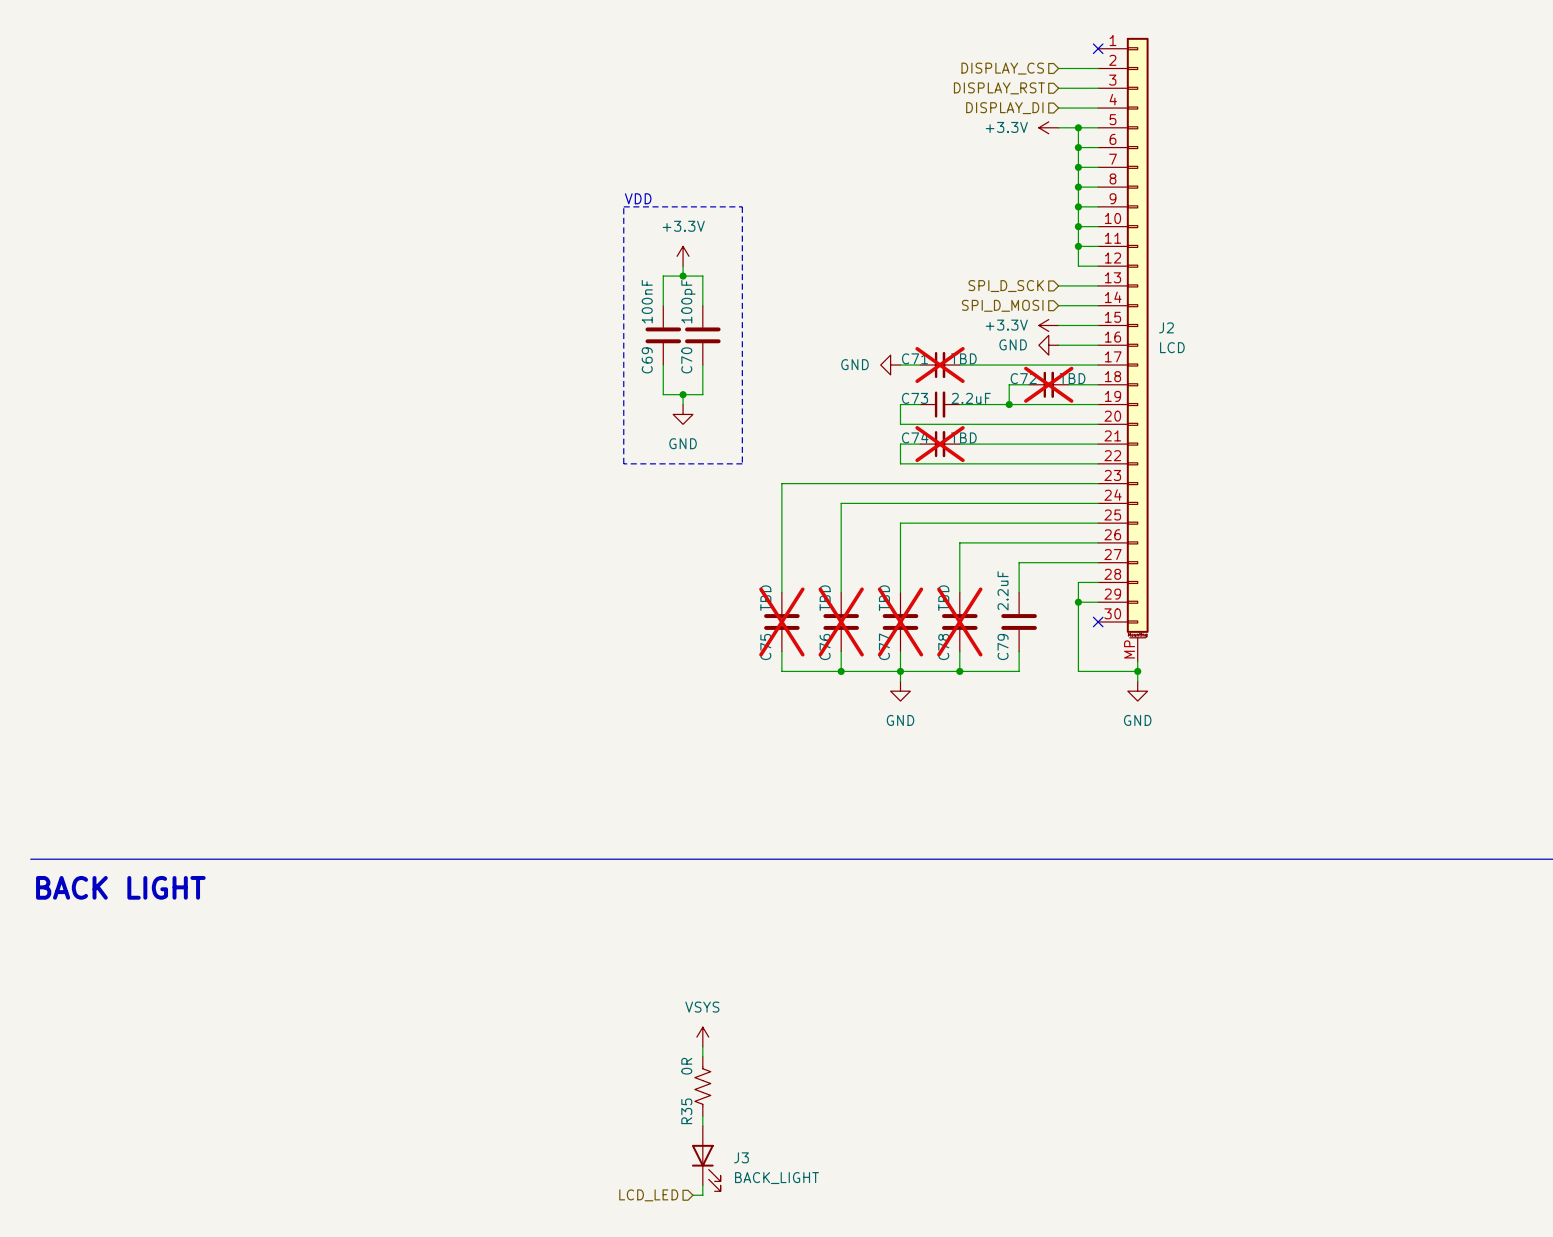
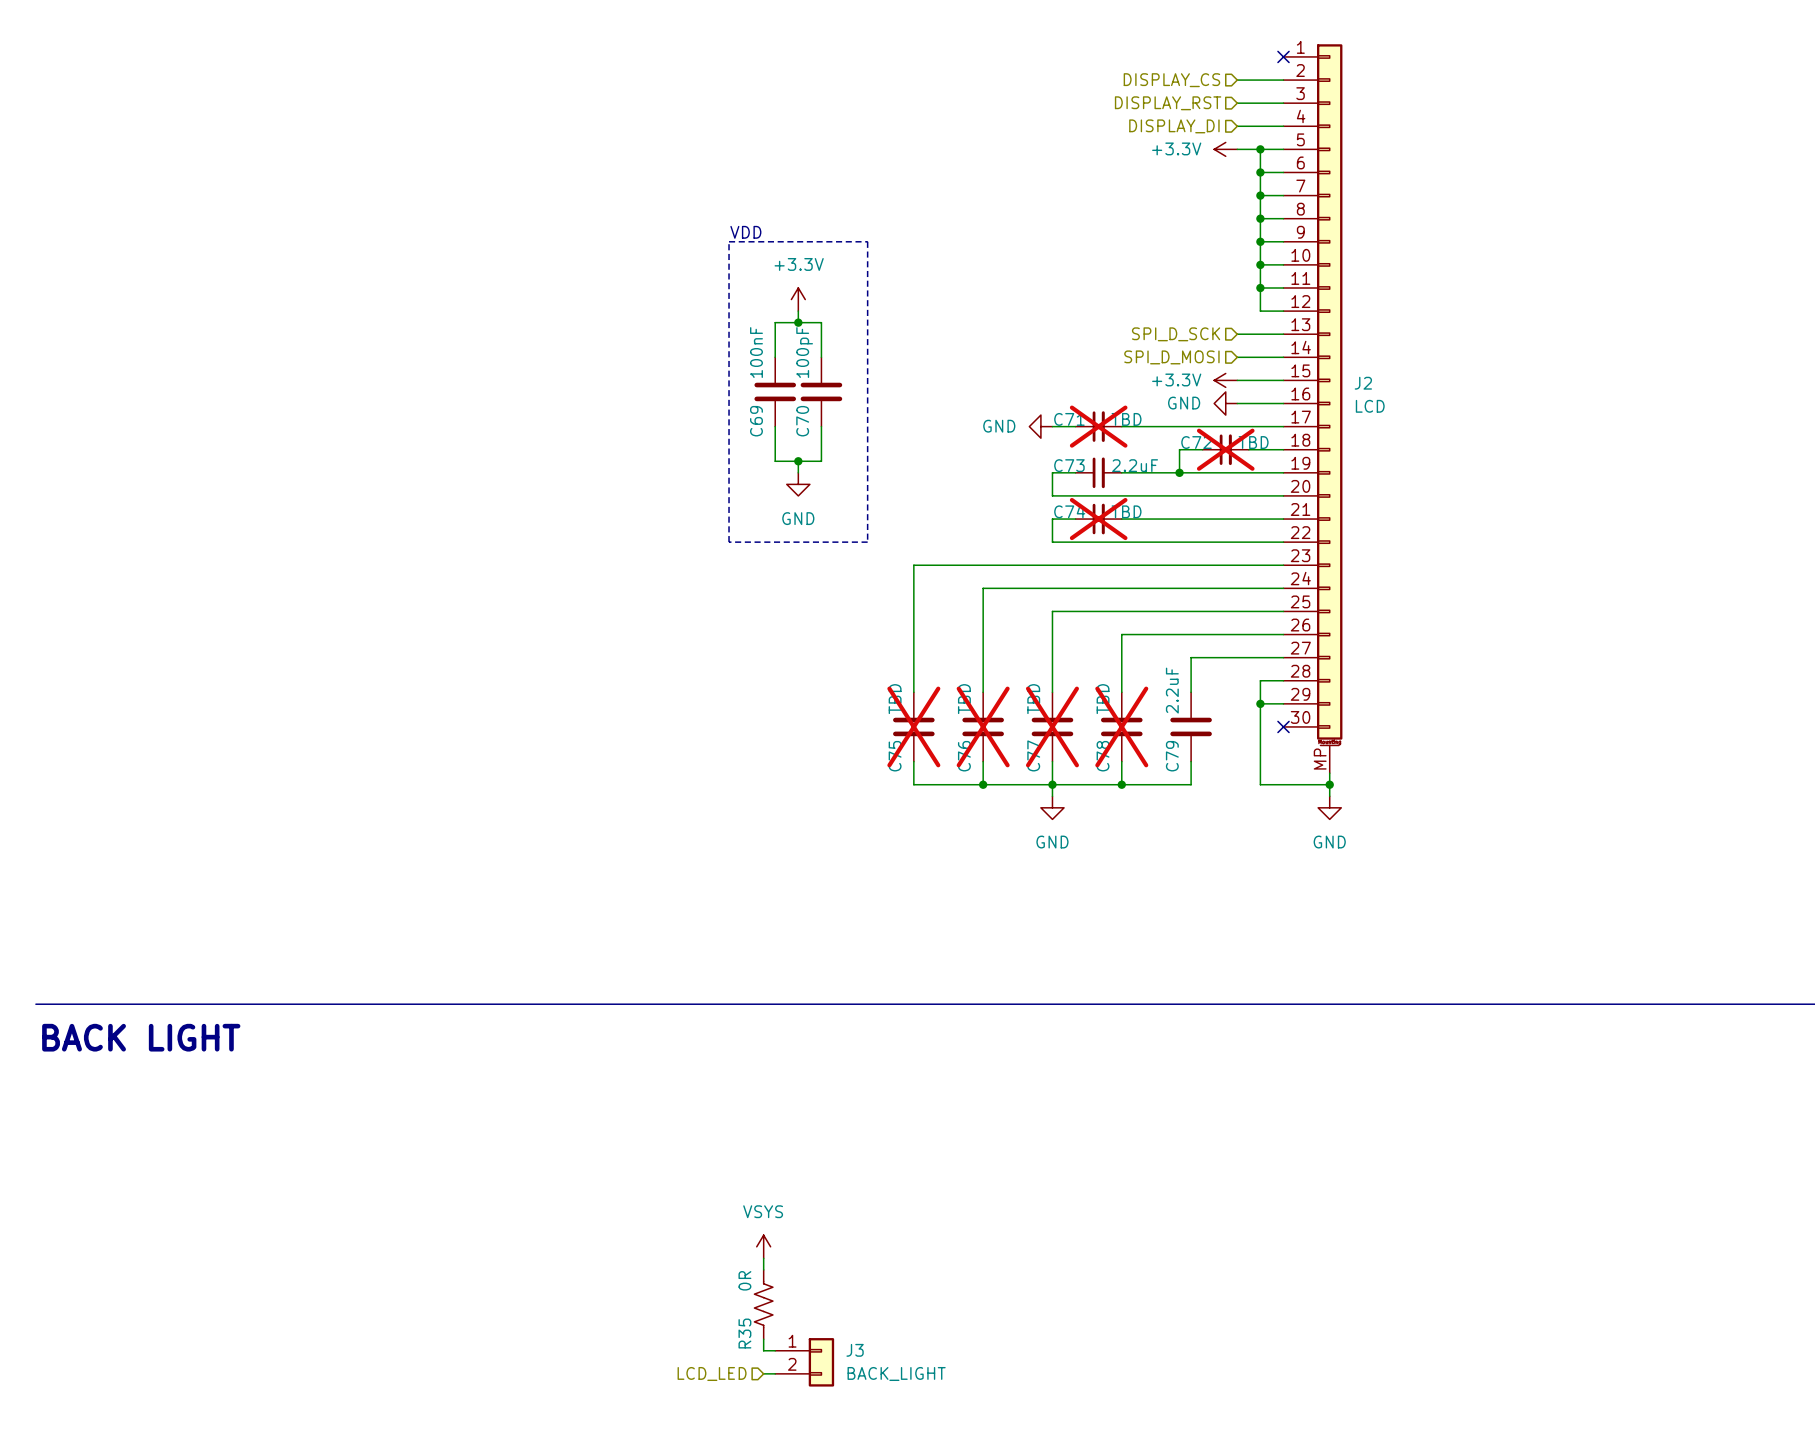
power symbol position: VSYS (702, 1037) -> VSYS (763, 1246)
wire: (702, 1047) (702, 1056) -> (763, 1258) (763, 1269)
R35 position: (702, 1086) -> (763, 1304)
wire: (702, 1116) (702, 1126) -> none
J3 symbol: [691, 1126, 721, 1192] -> [775, 1338, 835, 1387]
wire: none -> (763, 1339) (763, 1350) (775, 1350)
wire: none -> (763, 1373) (775, 1373)
wire: (702, 1185) (702, 1195) (692, 1195) -> none
hierarchical label position: LCD_LED (648, 1195) -> LCD_LED (712, 1373)

